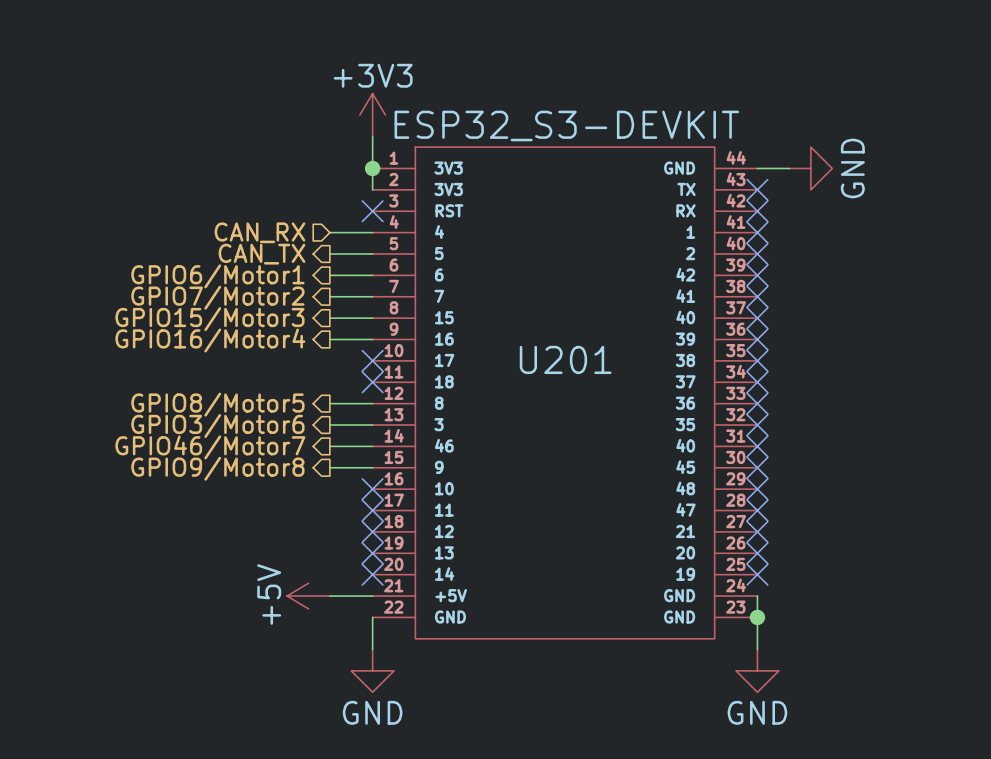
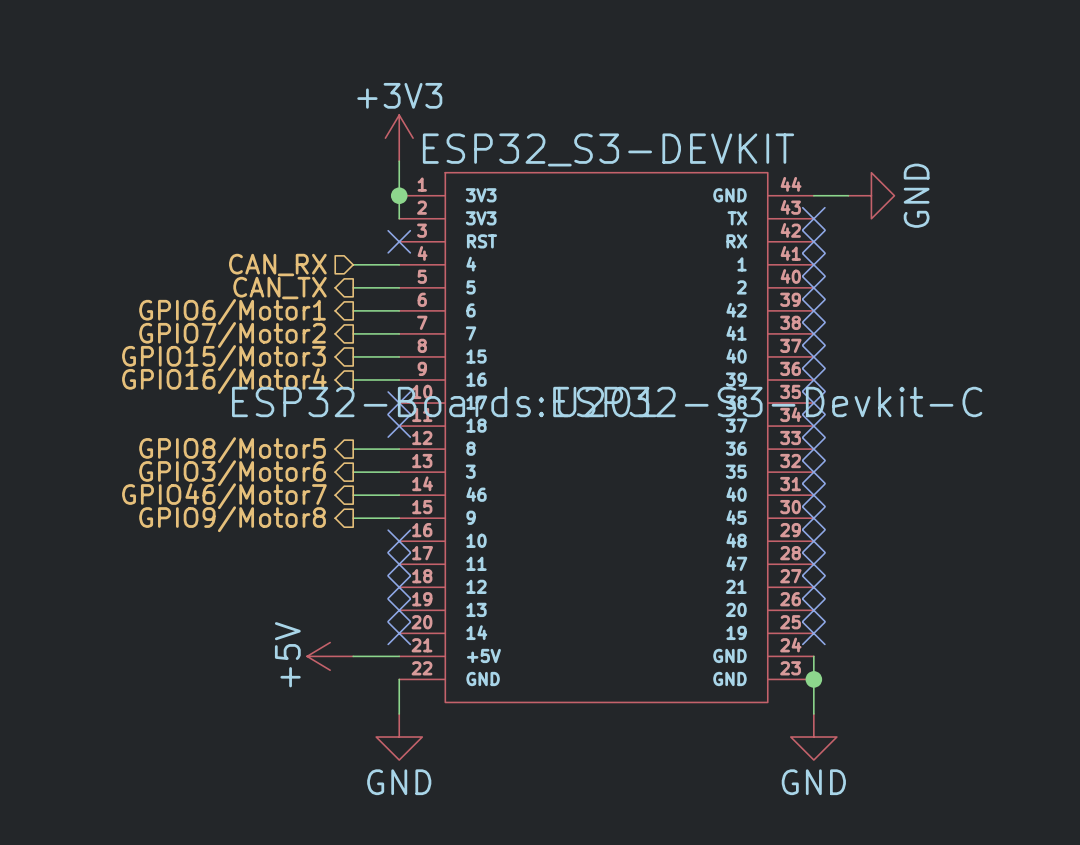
U201 text: none -> ESP32-Boards:ESP32-S3-Devkit-C (607, 401)

